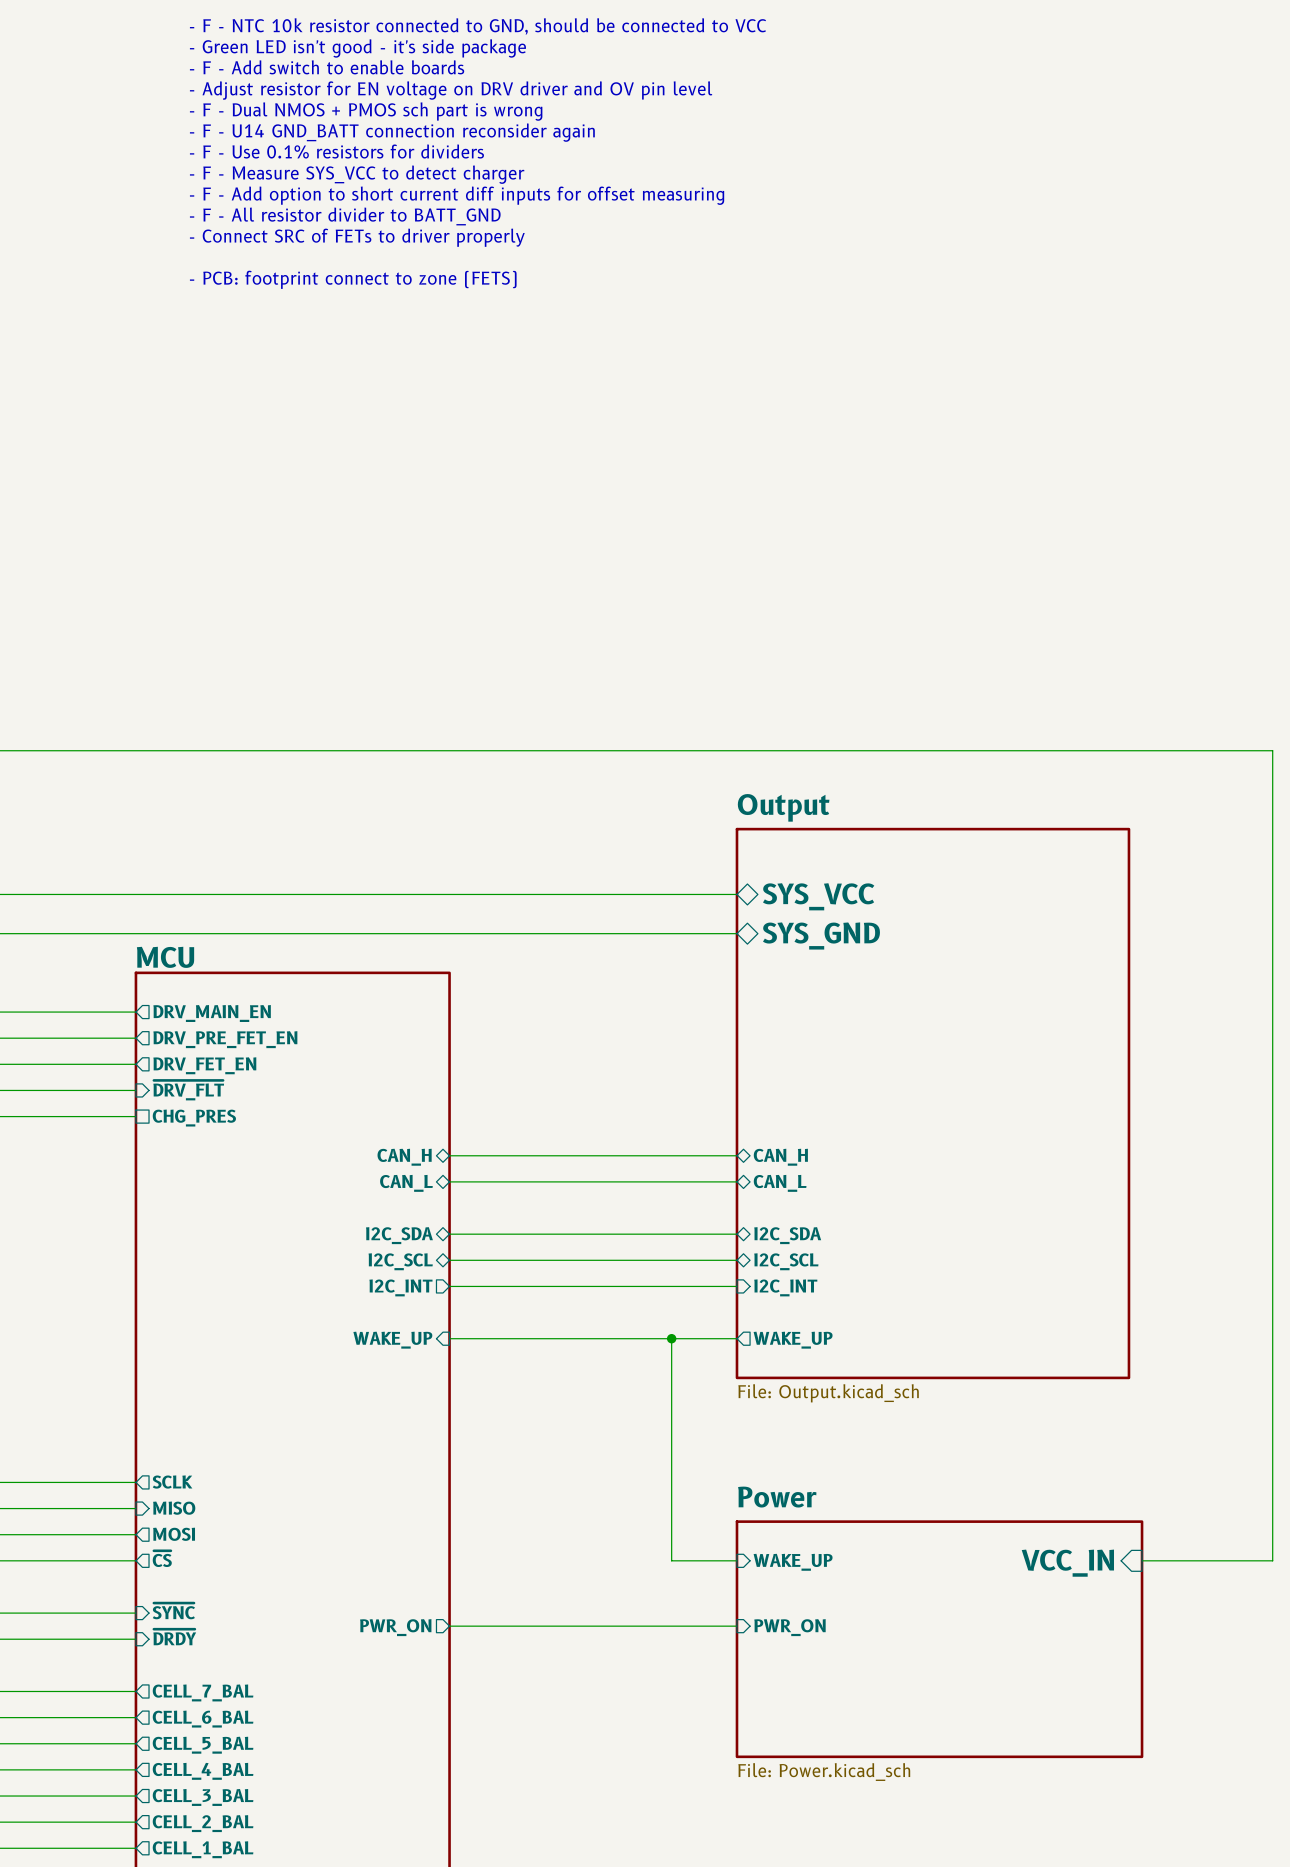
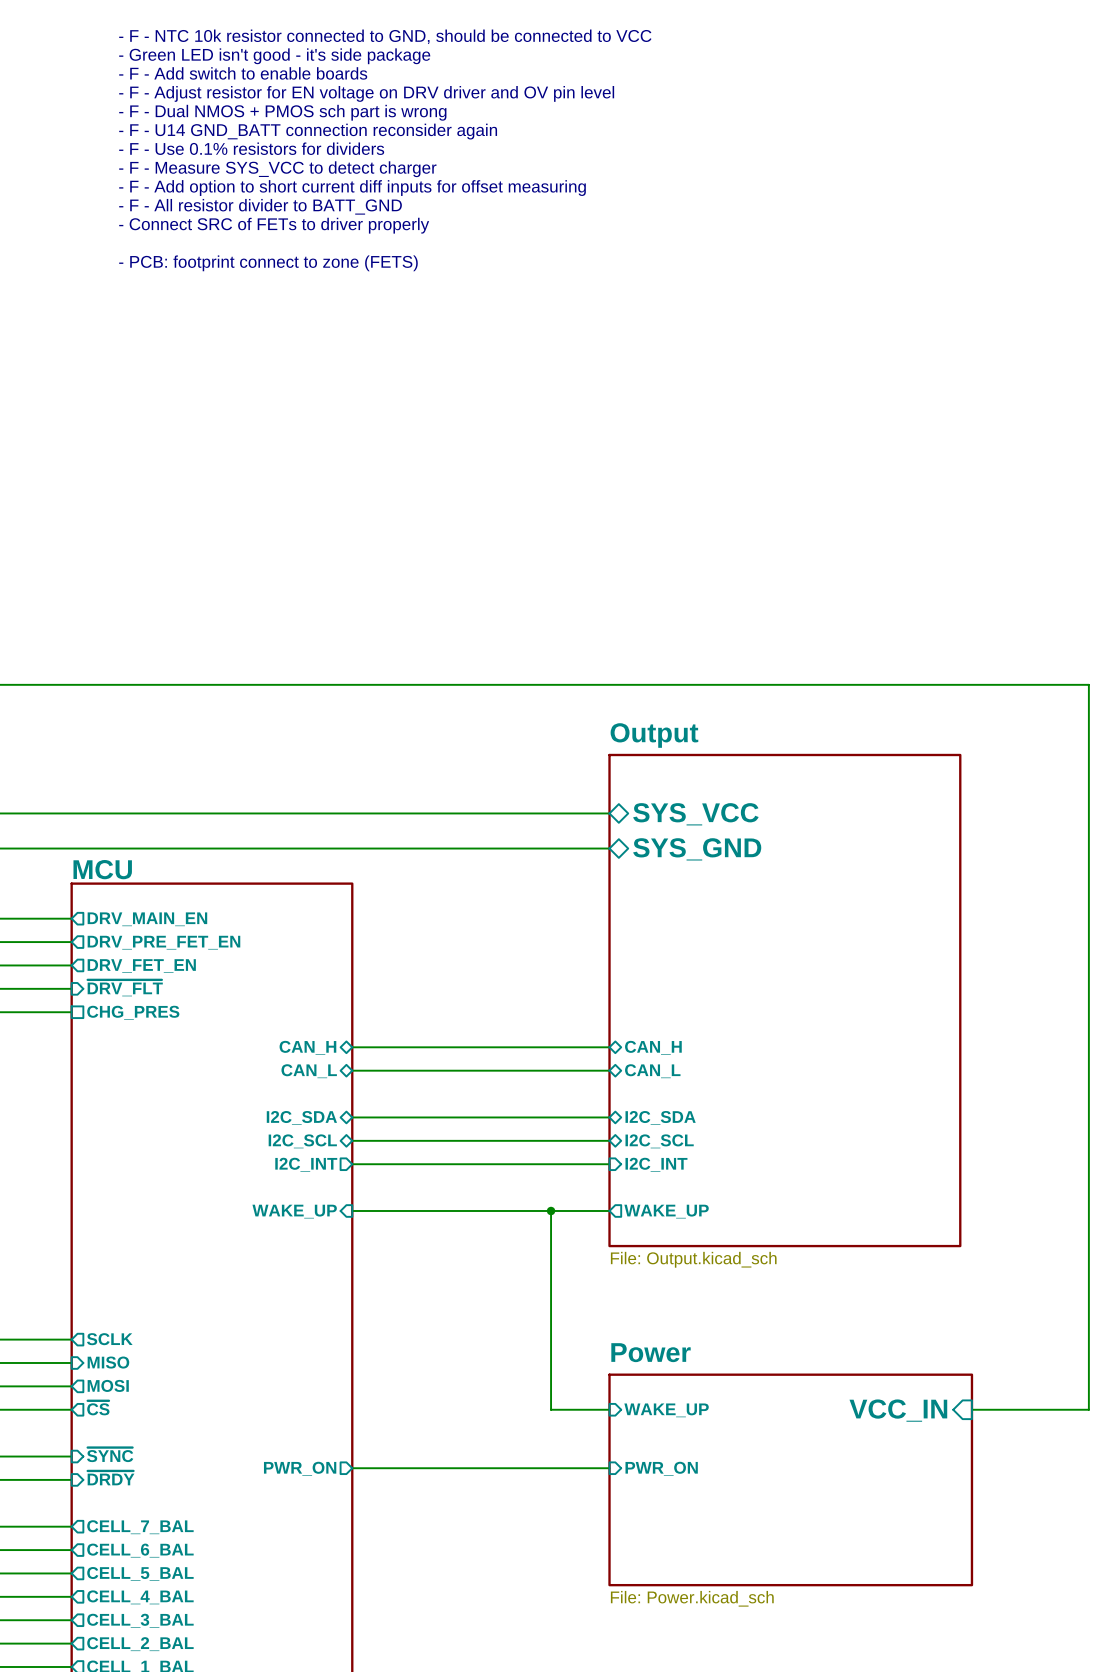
text: - Adjust resistor for EN voltage on DRV driver and OV pin level (451, 90) -> - F - Adjust resistor for EN voltage on DRV driver and OV pin level (366, 93)

